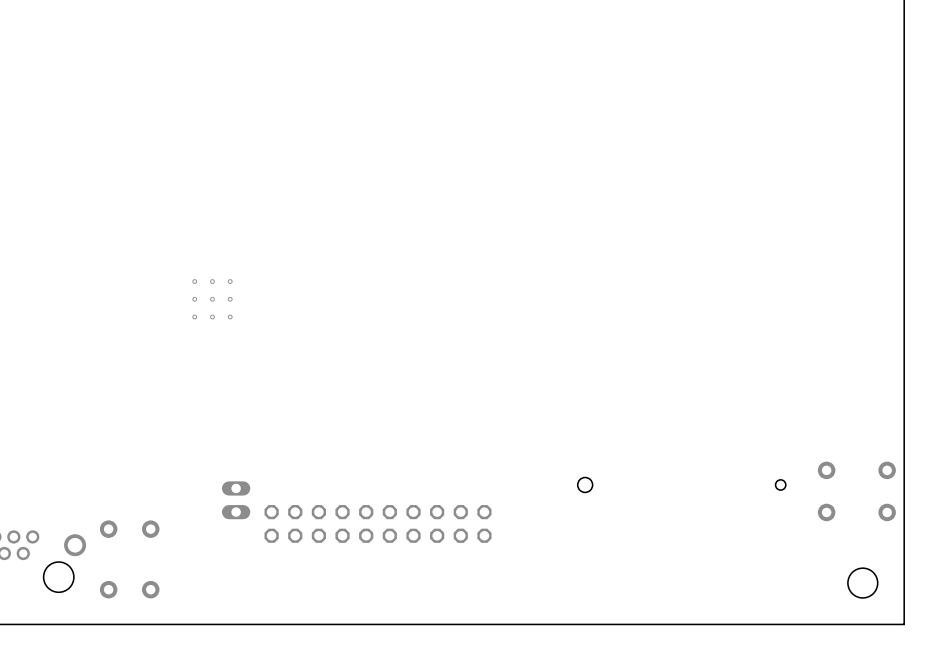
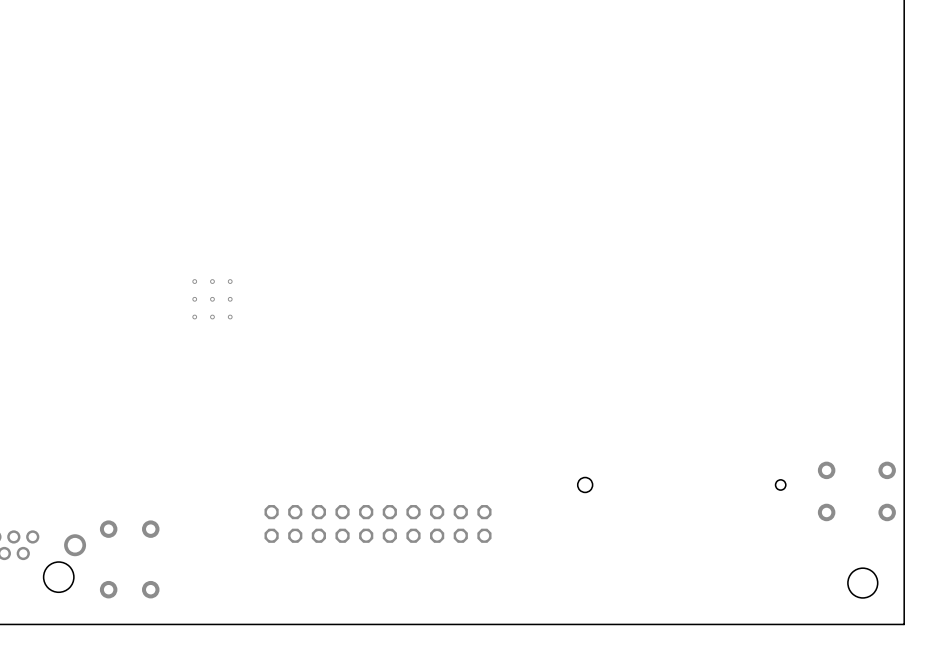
part: (236, 500) -> none

